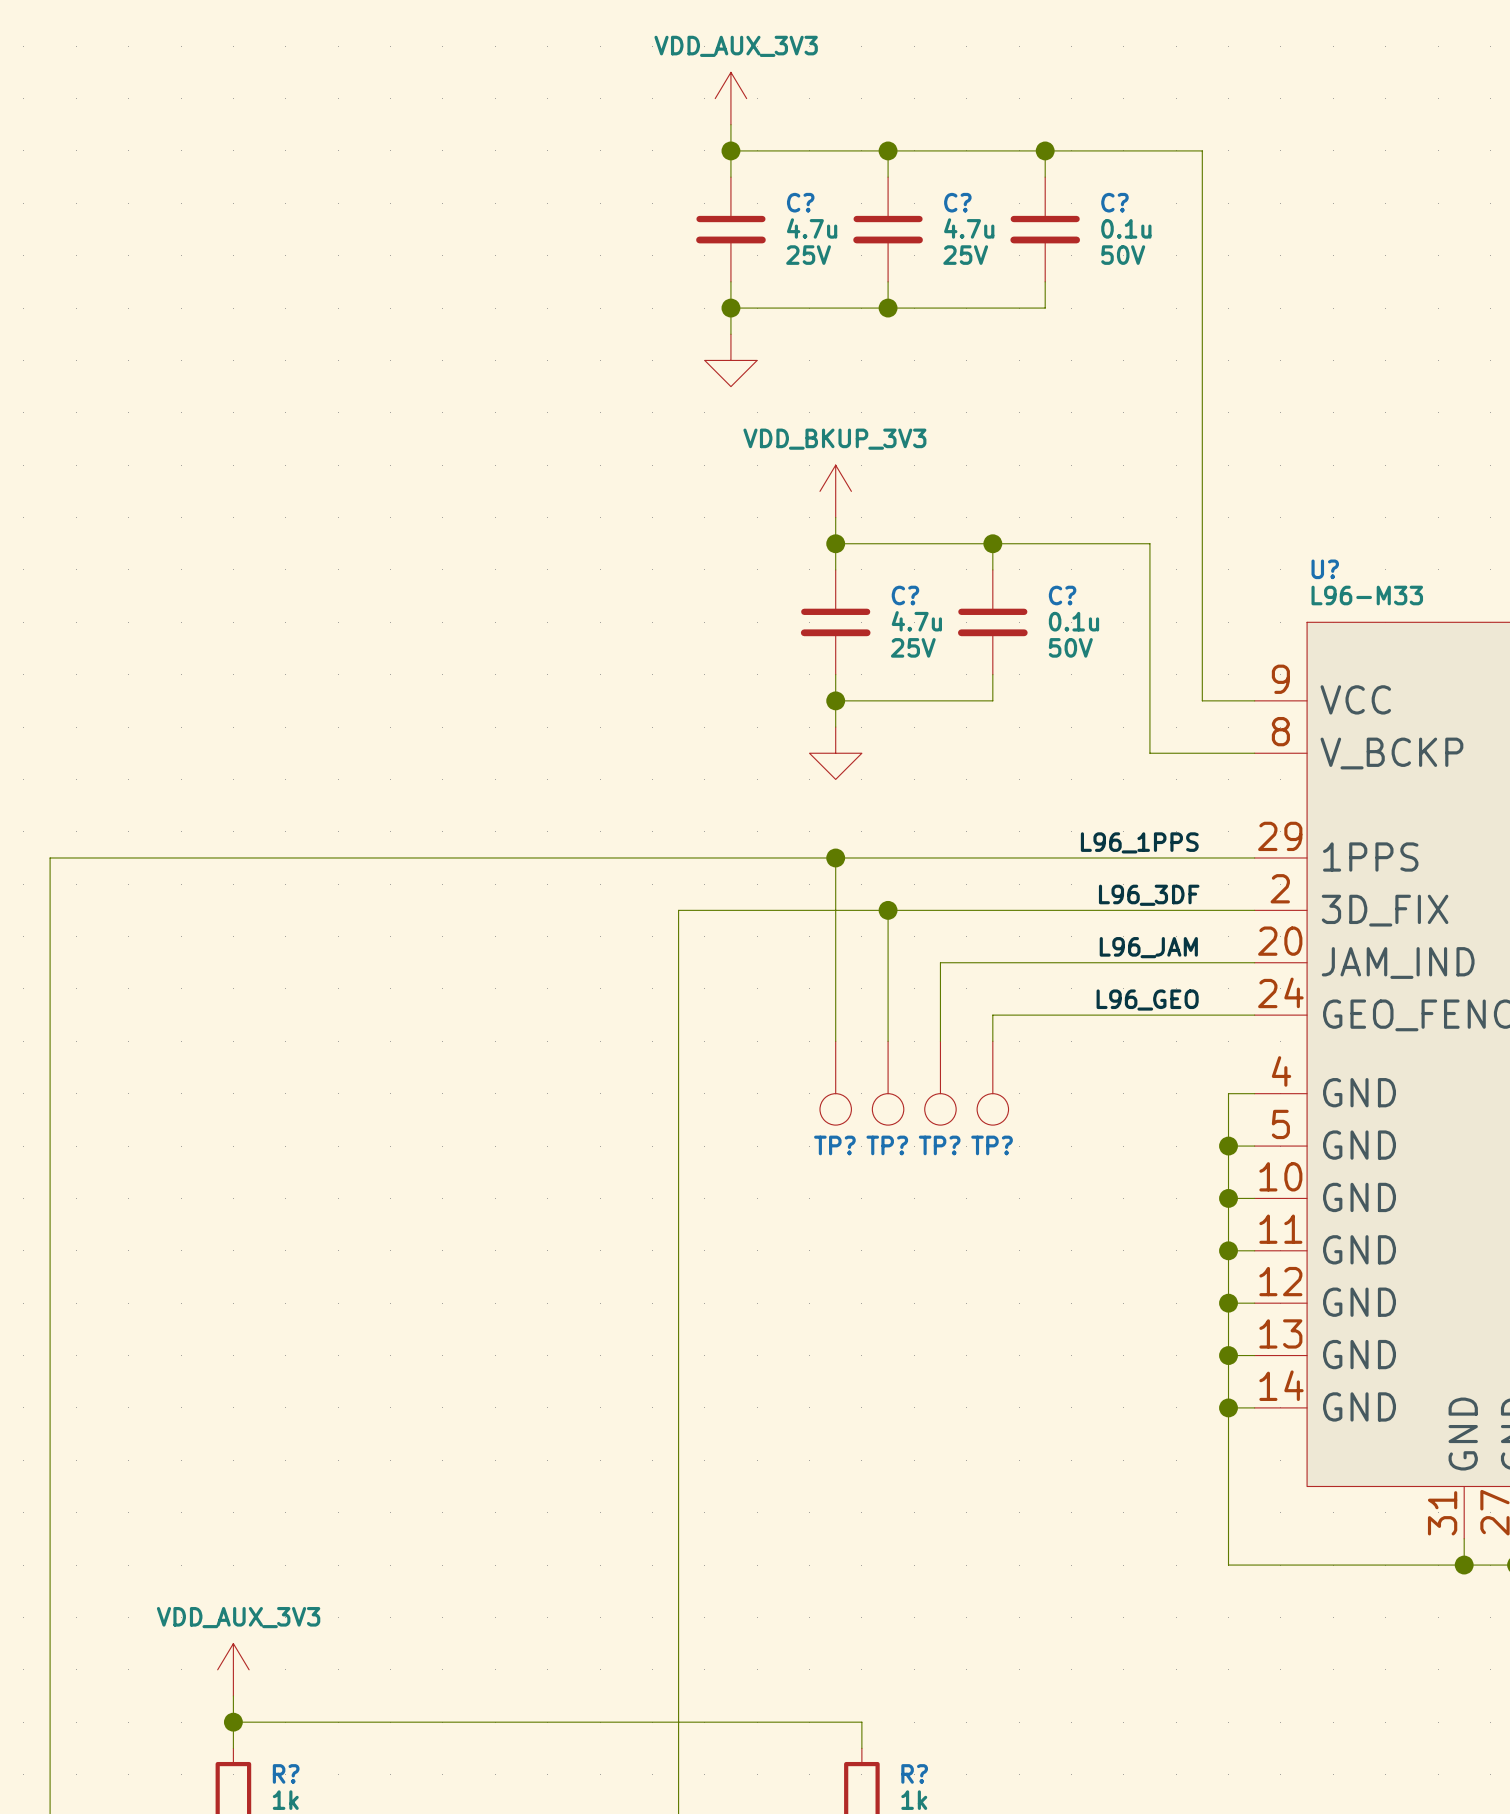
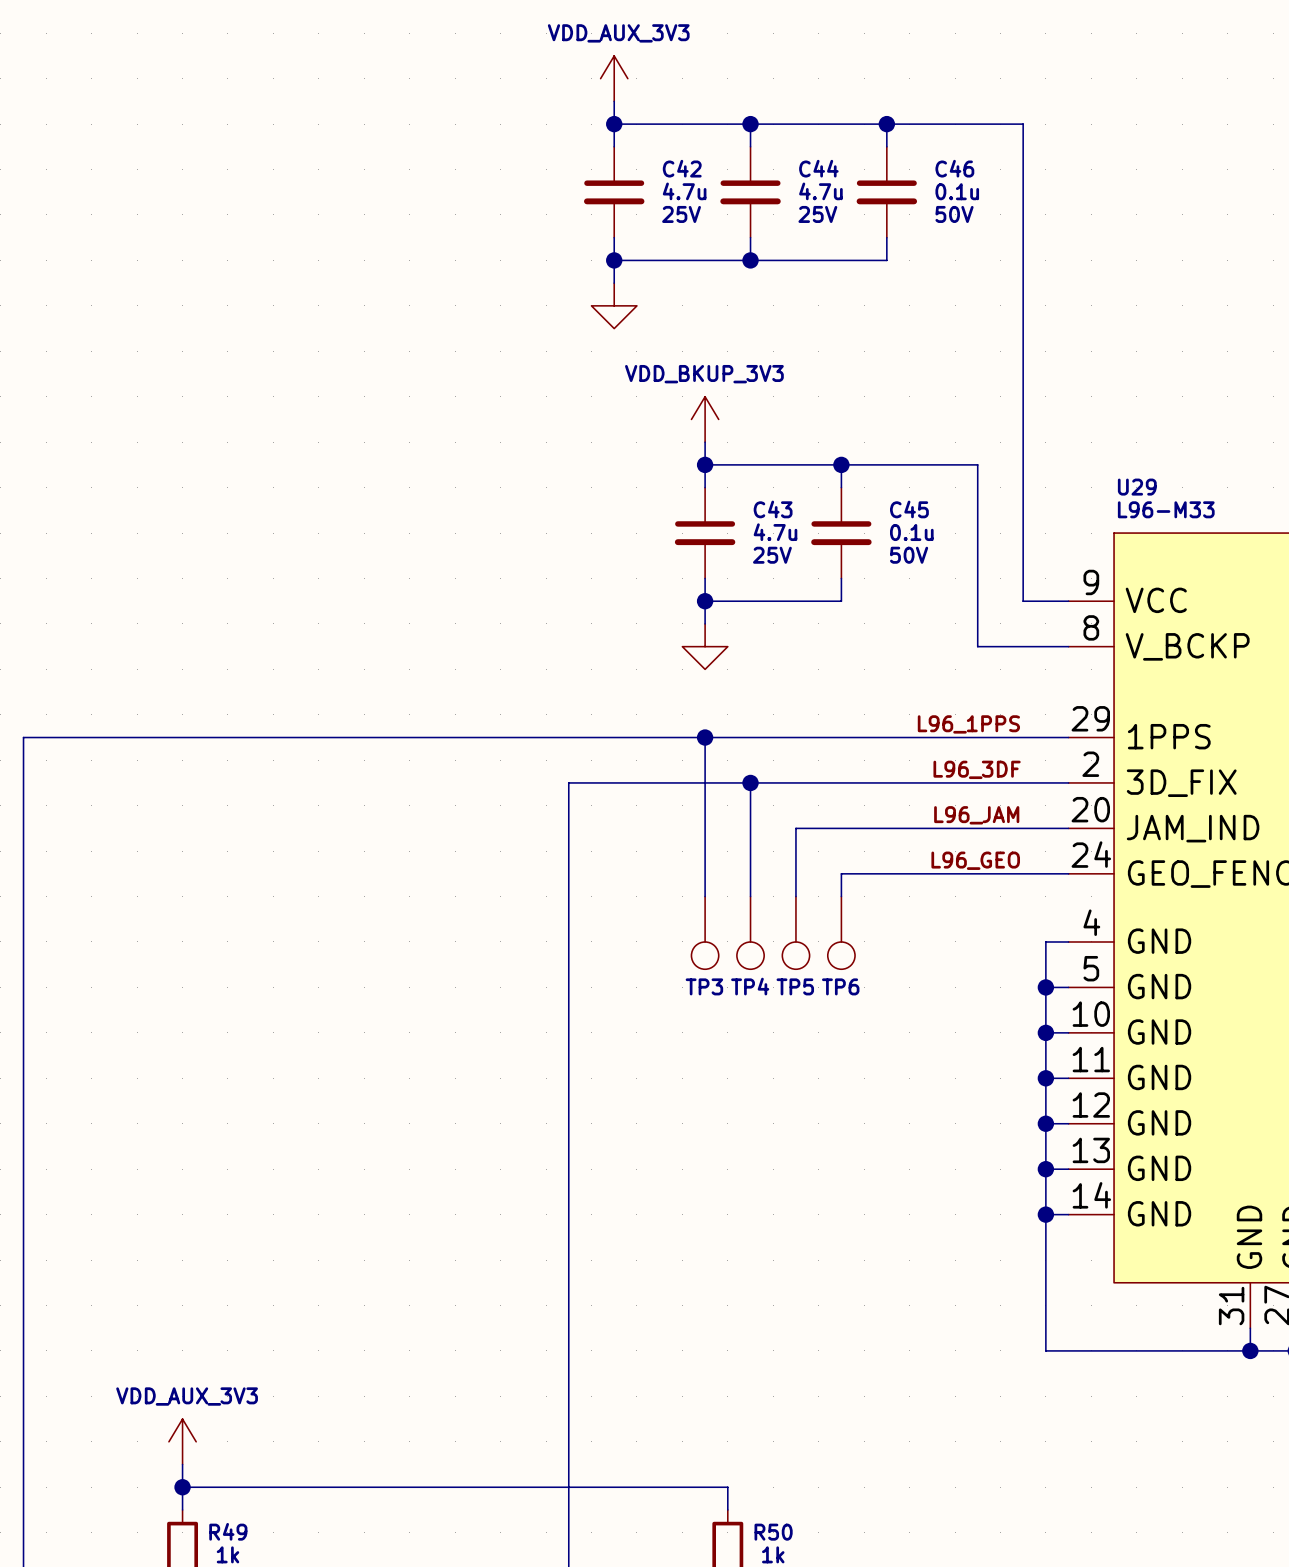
C? name: C? (800, 202) -> C42 (682, 168)
C? name: C? (957, 202) -> C44 (818, 168)
C? name: C? (1114, 202) -> C46 (954, 168)
U? name: U? (1325, 569) -> U29 (1137, 487)
C? name: C? (905, 595) -> C43 (773, 509)
C? name: C? (1062, 595) -> C45 (909, 509)
TP? name: TP? (834, 1145) -> TP3 (704, 986)
TP? name: TP? (887, 1145) -> TP4 (750, 986)
TP? name: TP? (939, 1145) -> TP5 (795, 986)
TP? name: TP? (992, 1145) -> TP6 (840, 986)
R? name: R? (286, 1773) -> R49 (228, 1531)
R? name: R? (914, 1773) -> R50 (773, 1532)

